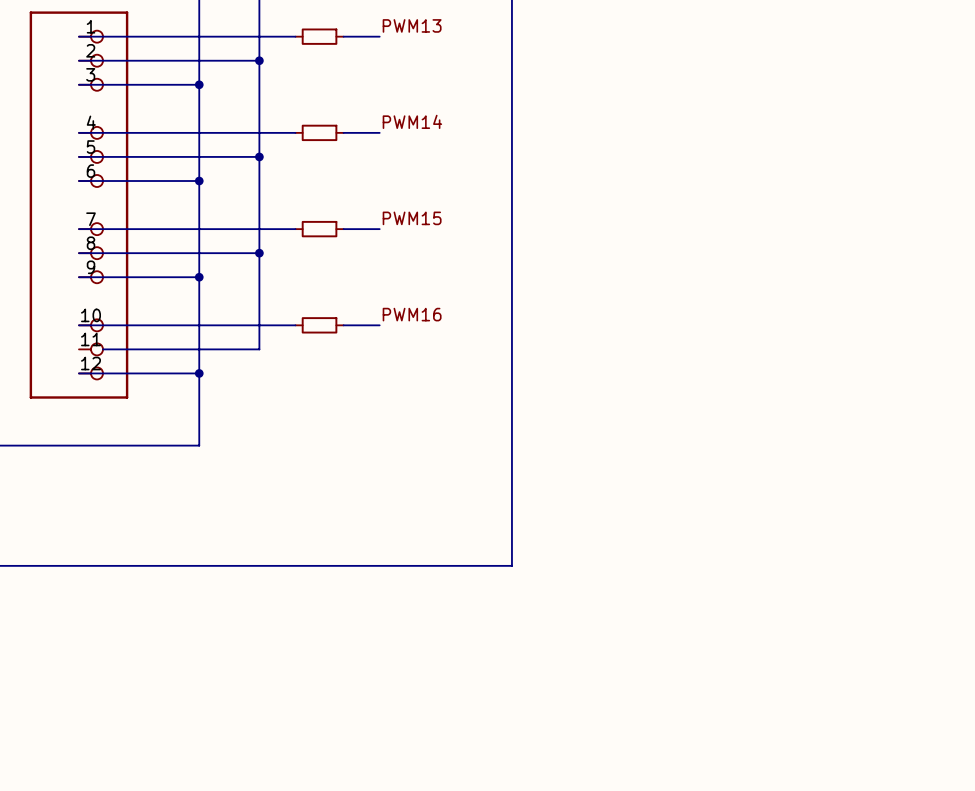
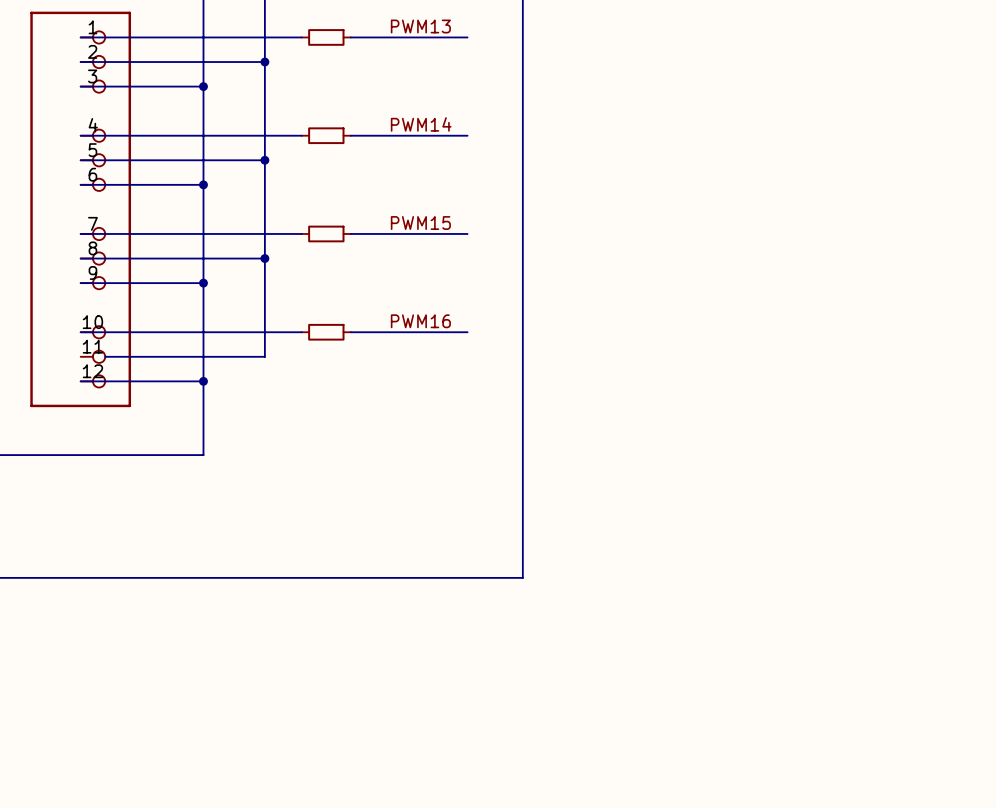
wire: none -> (387, 37) (467, 37)
wire: none -> (387, 135) (467, 135)
wire: none -> (387, 233) (467, 233)
wire: none -> (387, 332) (467, 332)

